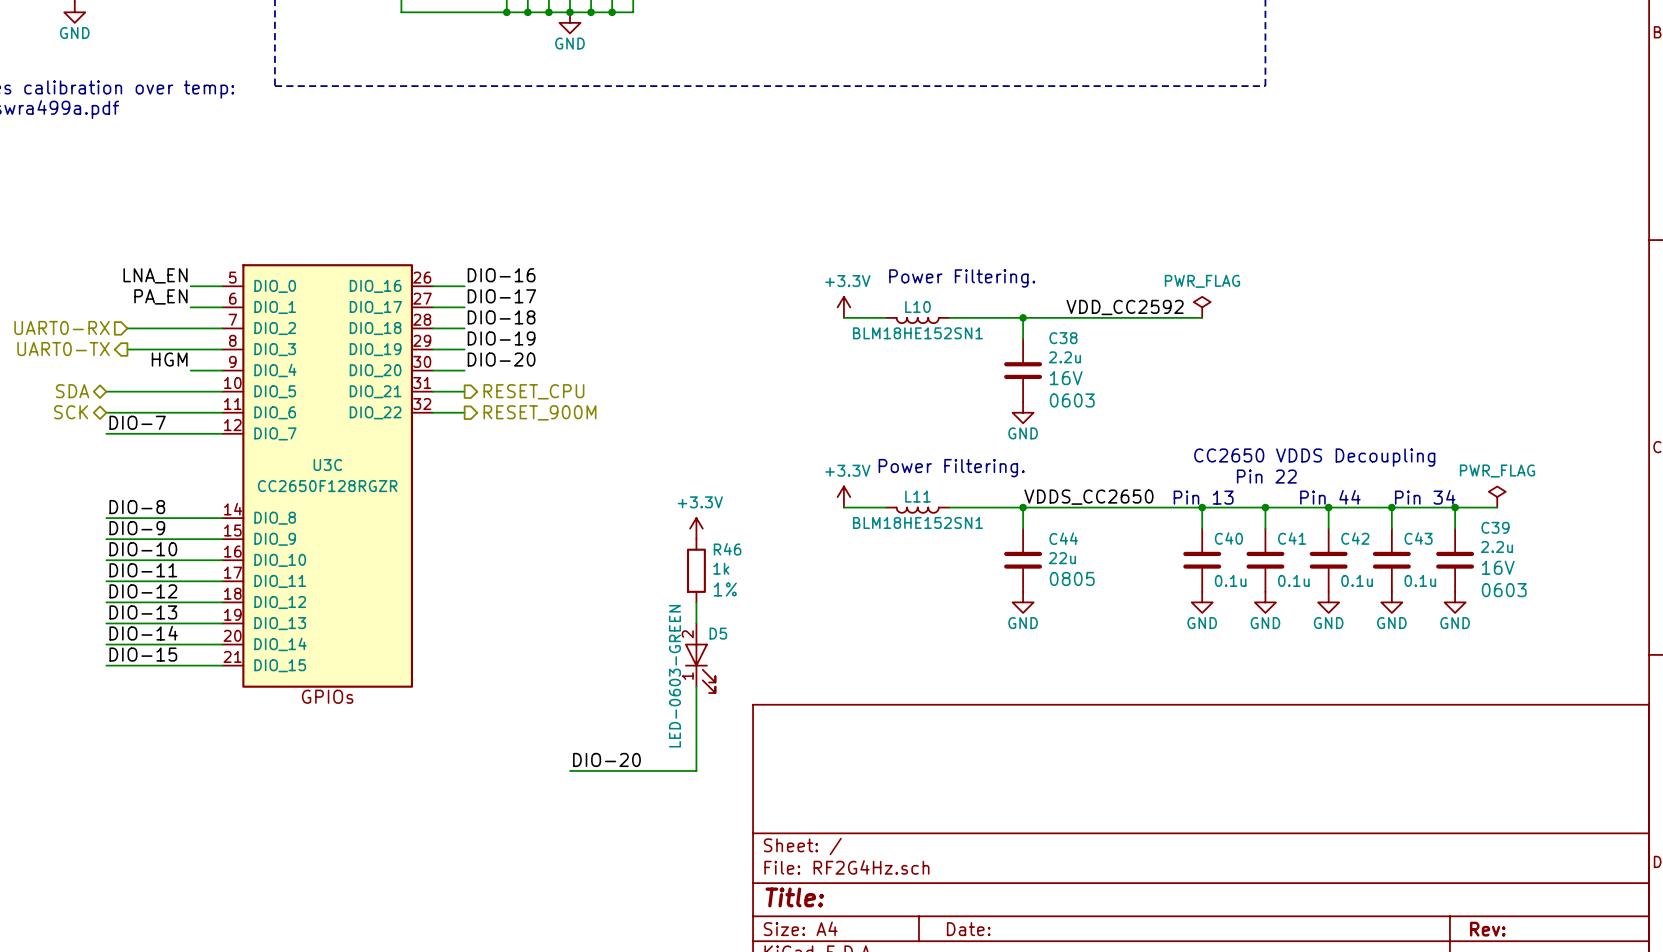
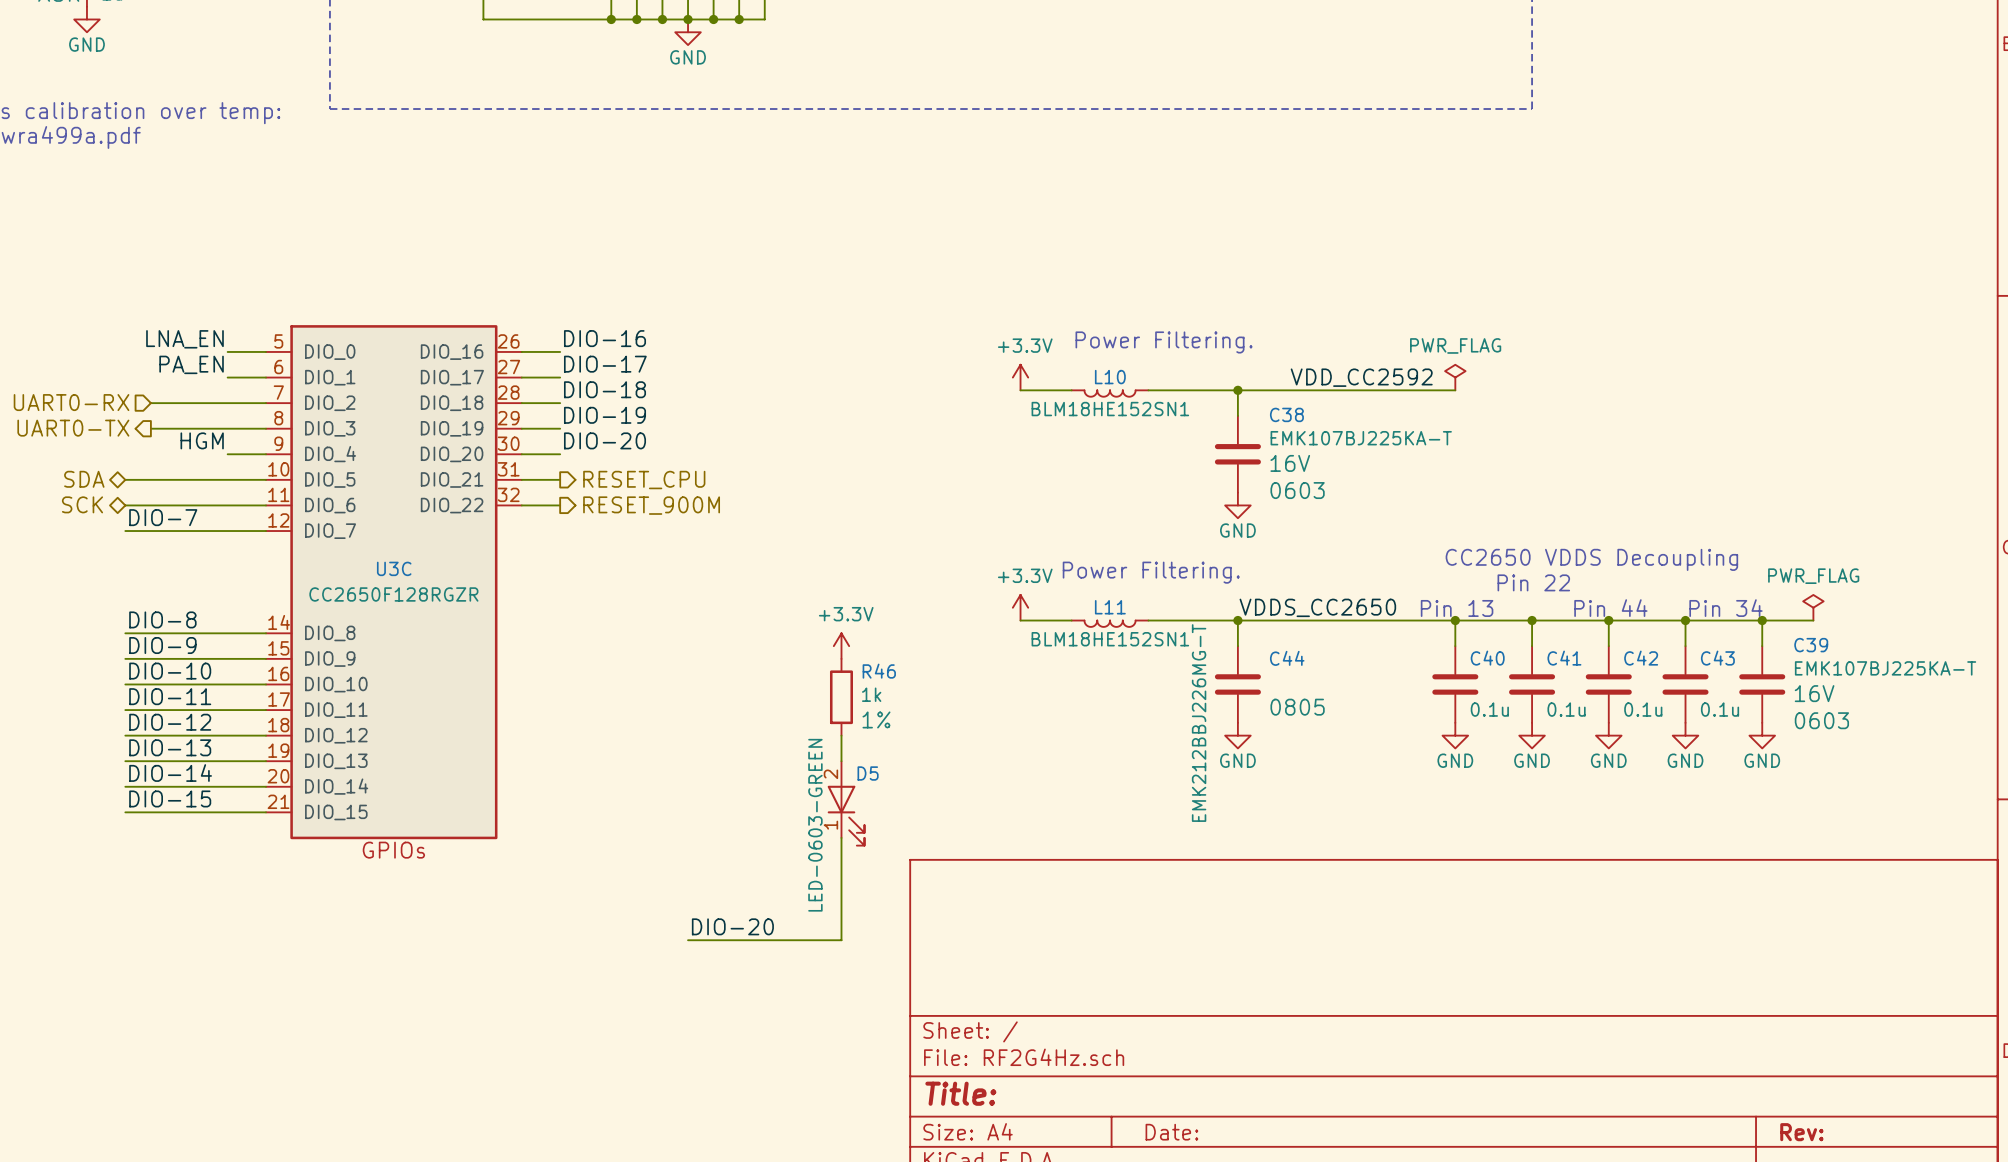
C38 value: 2.2u (1064, 357) -> EMK107BJ225KA-T (1361, 438)
C39 value: 2.2u (1496, 546) -> EMK107BJ225KA-T (1885, 668)
C44 value: 22u (1062, 558) -> EMK212BBJ226MG-T (1199, 723)

